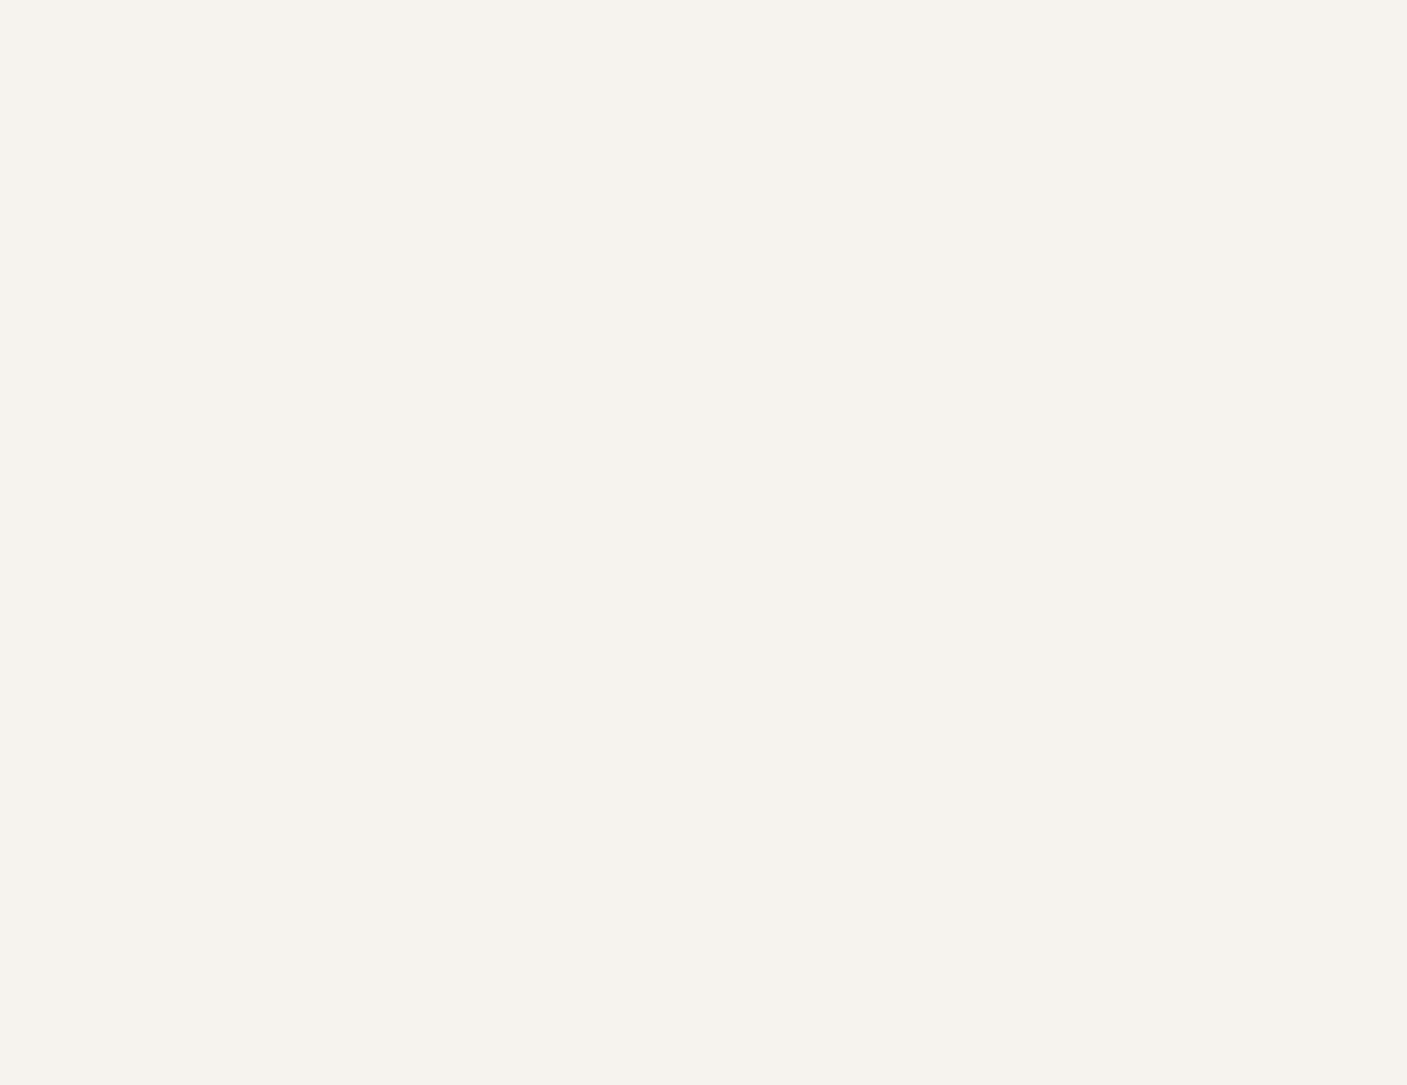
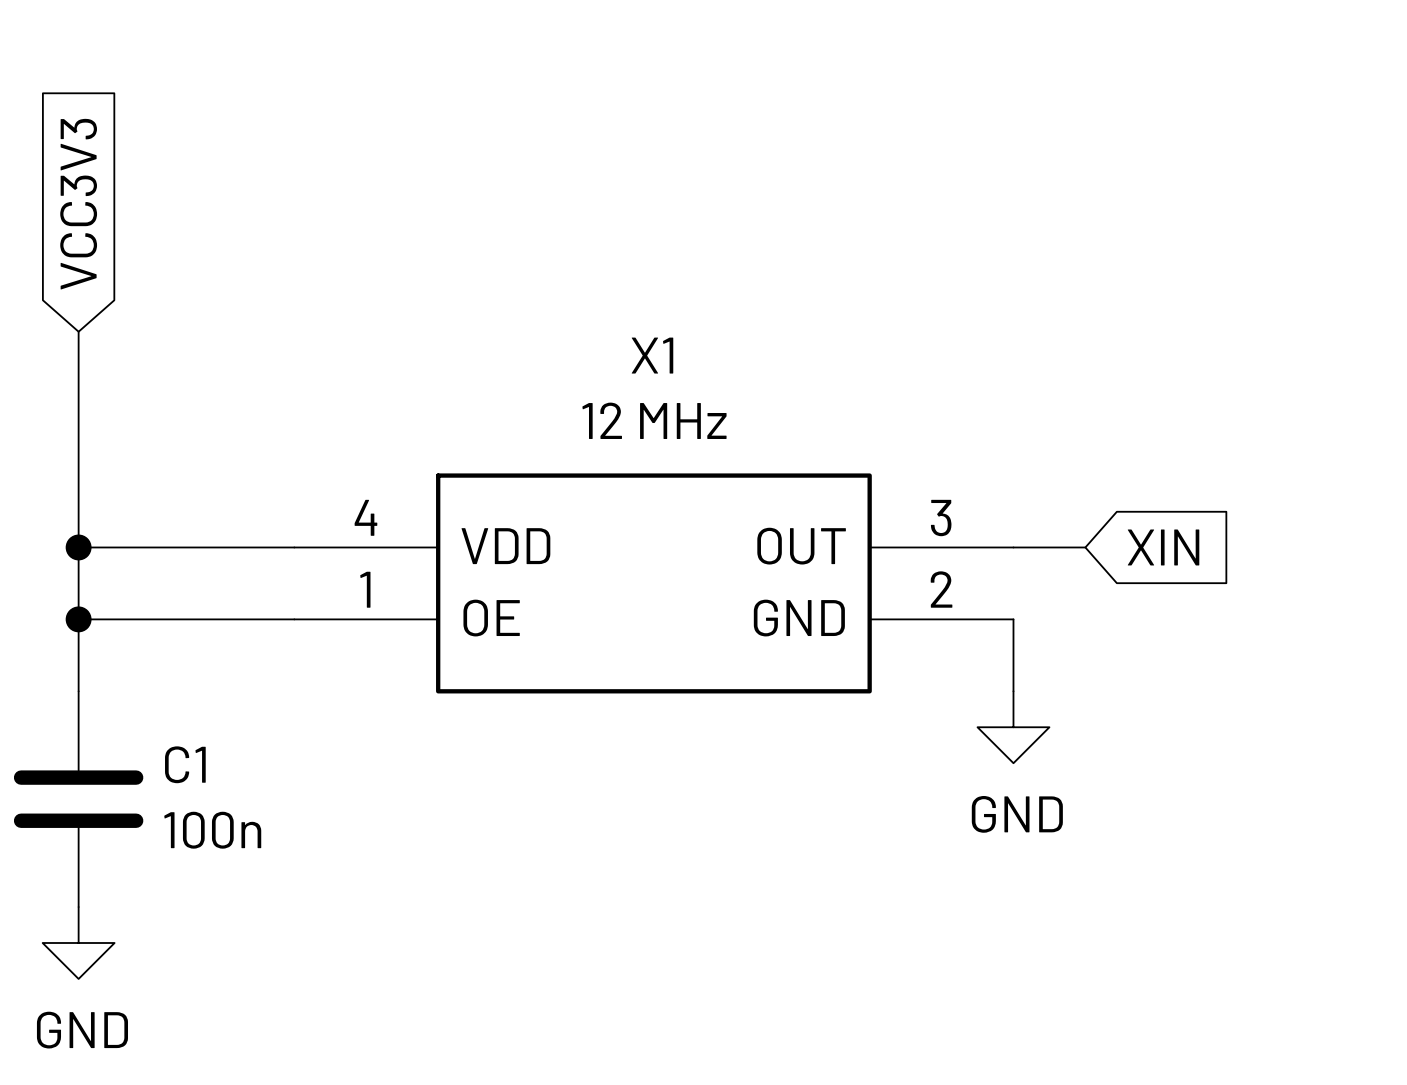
global label: none -> VCC3V3 (78, 204)
wire: none -> (78, 331) (78, 691)
wire: none -> (78, 547) (294, 547)
junction: none -> (78, 547)
wire: none -> (1013, 547) (1085, 547)
global label: none -> XIN (1163, 547)
X1: none -> 12 MHz (653, 583)
wire: none -> (78, 619) (294, 619)
junction: none -> (78, 619)
wire: none -> (1013, 619) (1013, 691)
power symbol: none -> GND (1013, 727)
C1: none -> 100n (78, 799)
power symbol: none -> GND (78, 942)

